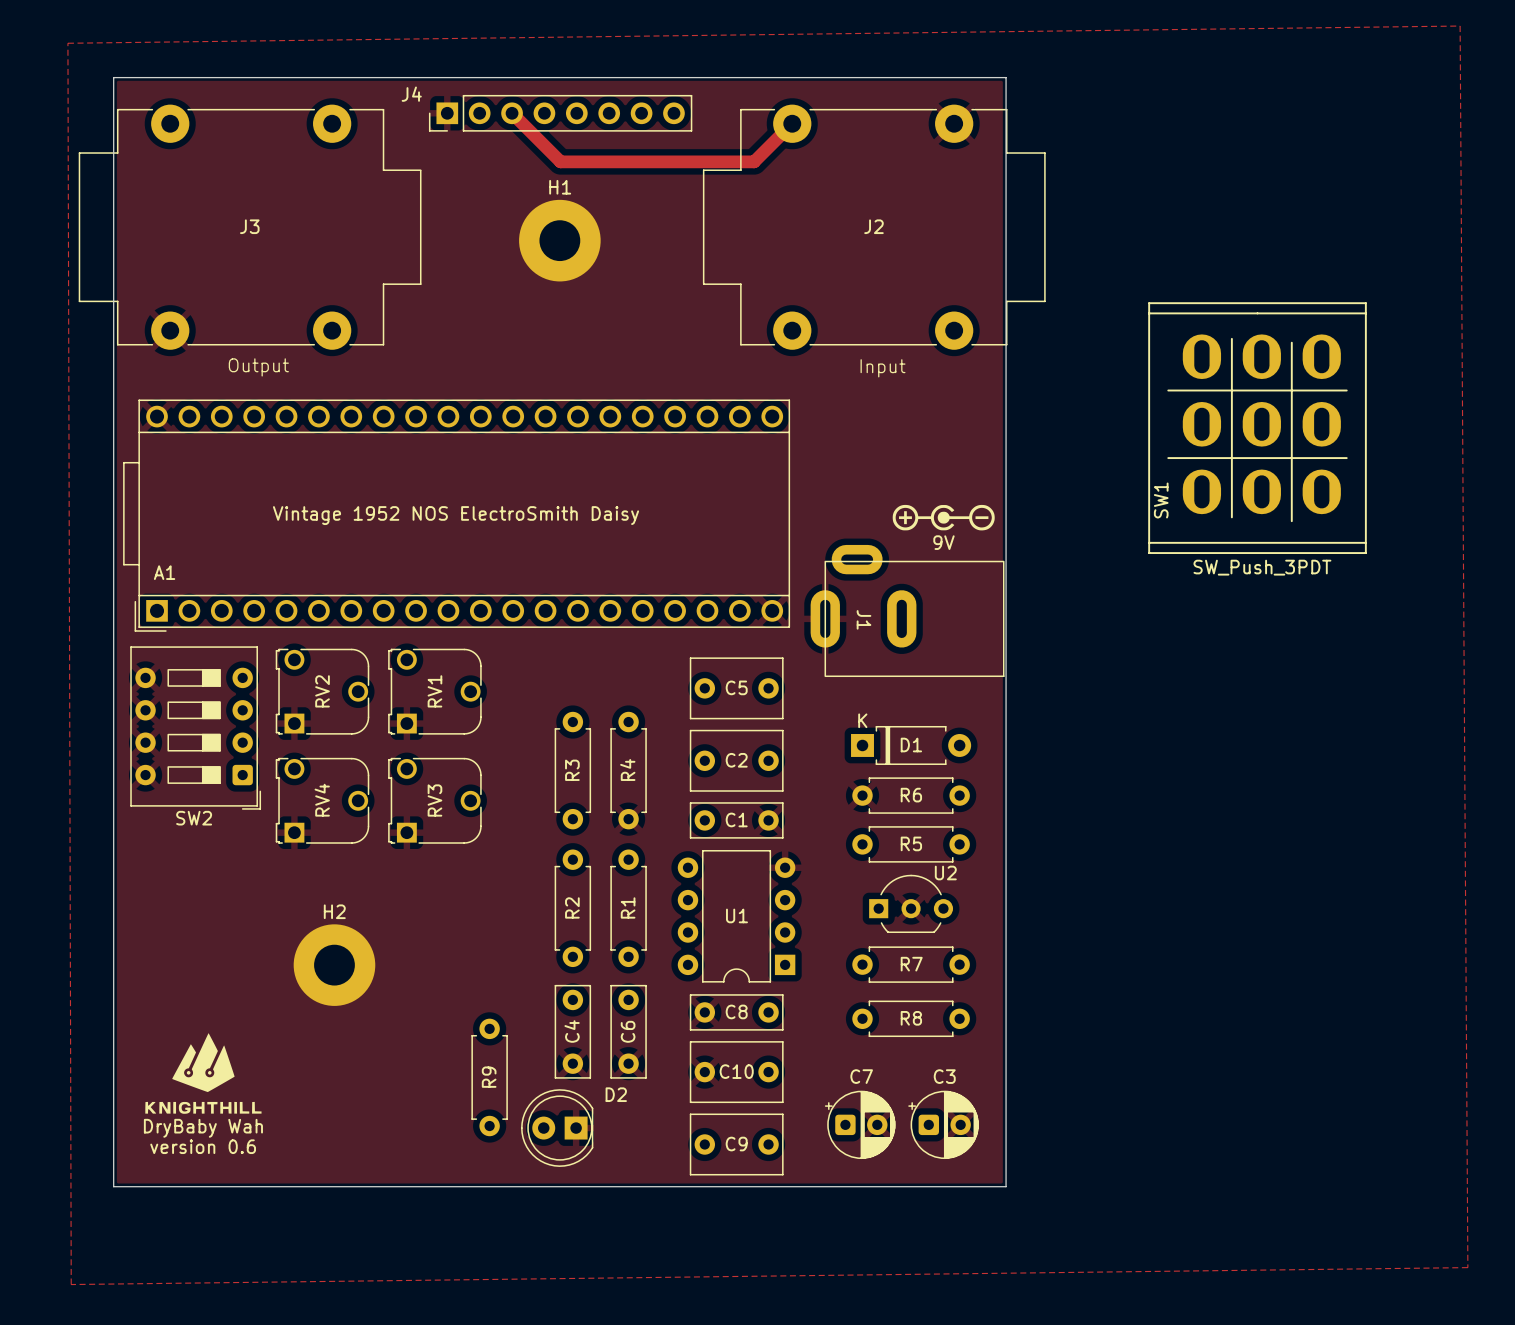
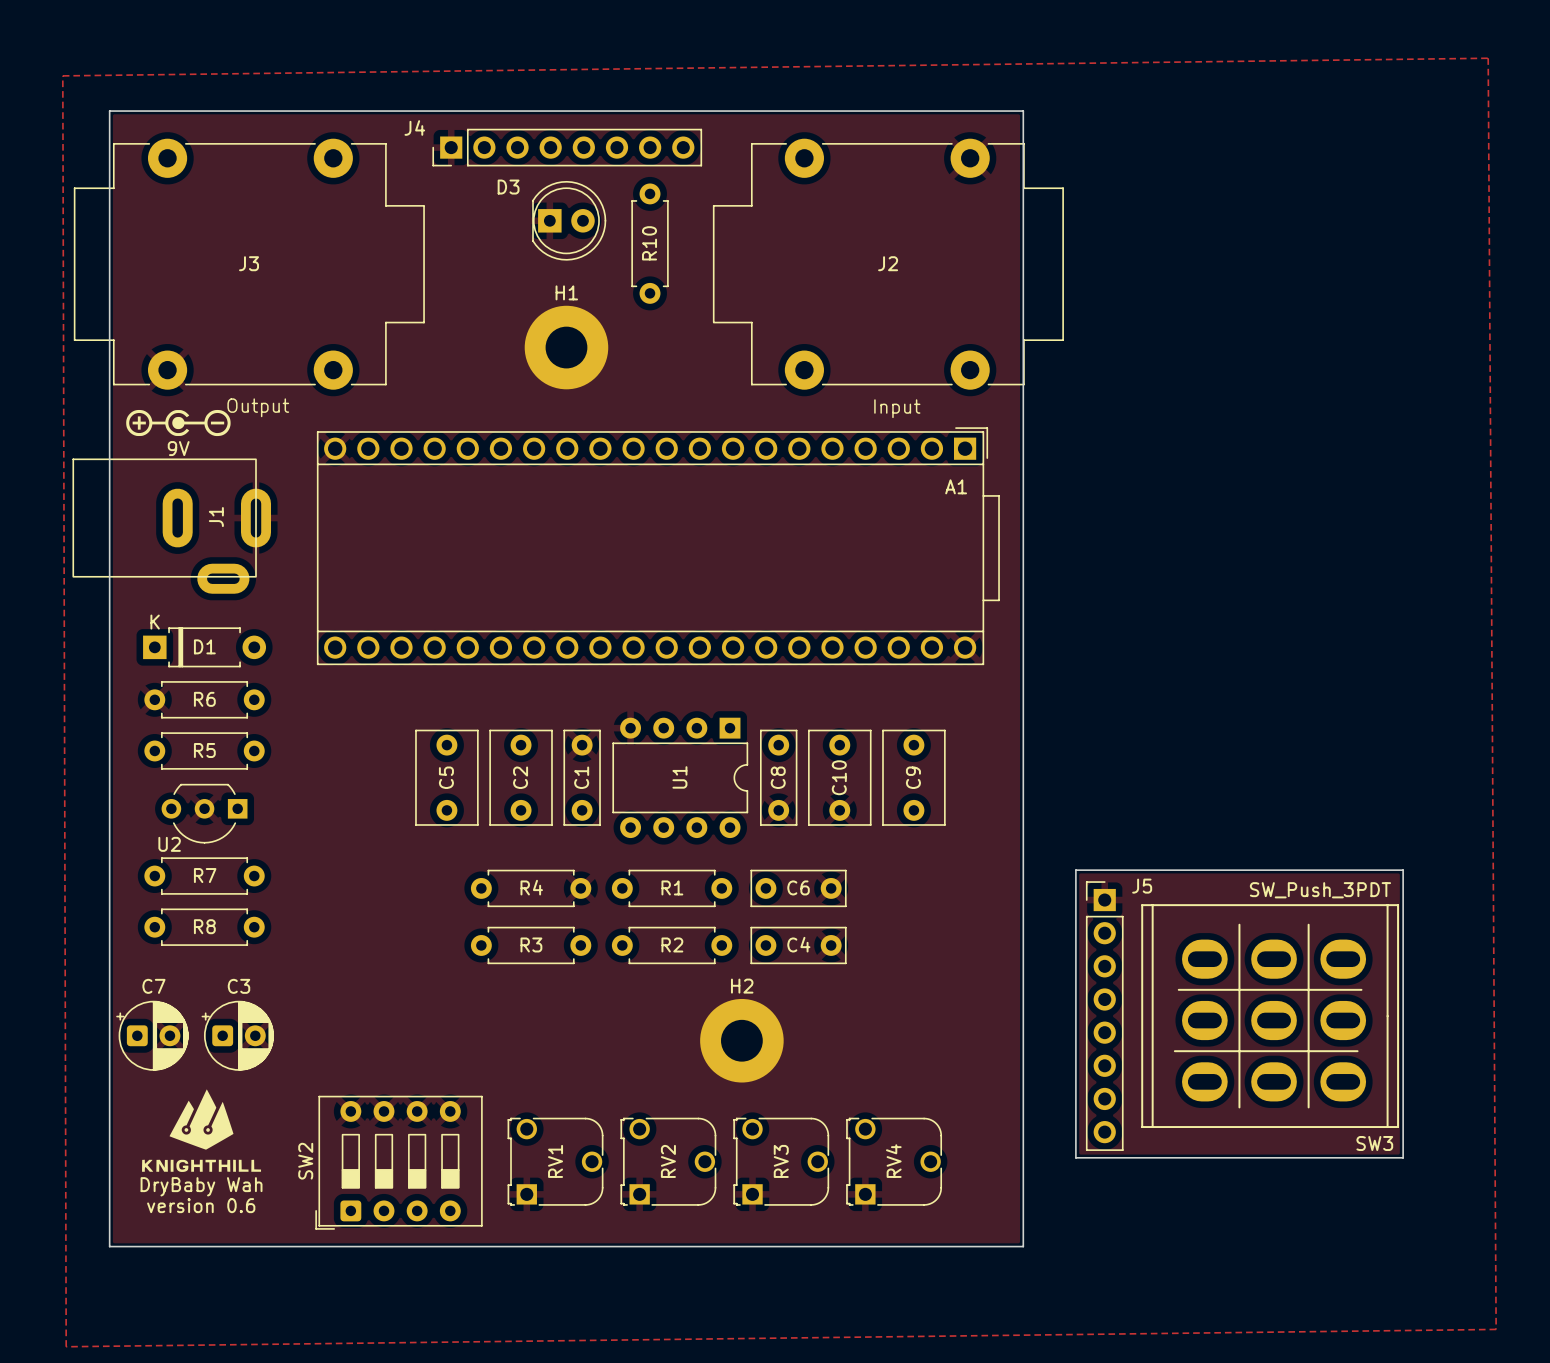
track: (512, 113) (560, 161) (754, 161) (792, 123) -> none
D3: none -> (569, 220)
R10: none -> (650, 243)
H1 position: (559, 240) -> (566, 347)
drawing: none -> [126, 409, 231, 437]
text: none -> 9V (178, 448)
SW1: SW_Push_3PDT (1257, 428) -> none
drawing: [892, 504, 995, 531] -> none
A1 rotation: 0° (456, 515) -> 180° (658, 546)
text: Vintage 1952 NOS ElectroSmith Daisy (456, 515) -> none
text: 9V (943, 542) -> none
J1 rotation: 0° (907, 610) -> 180° (171, 526)
J1 position: (907, 610) -> (171, 526)
C5 rotation: 0° (736, 688) -> 90° clockwise (446, 777)
C5 position: (736, 688) -> (446, 777)
RV2 position: (322, 691) -> (668, 1161)
RV1 position: (434, 691) -> (555, 1161)
SW2 rotation: 0° (195, 728) -> 90° clockwise (399, 1162)
SW2 position: (195, 728) -> (399, 1162)
D1 position: (911, 745) -> (204, 647)
C2 rotation: 0° (736, 760) -> 90° clockwise (521, 777)
C2 position: (736, 760) -> (521, 777)
R3 rotation: 0° (572, 770) -> 90° clockwise (531, 945)
R3 position: (572, 770) -> (531, 945)
R4 rotation: 0° (628, 770) -> 90° clockwise (531, 888)
R4 position: (628, 770) -> (531, 888)
R6 position: (911, 795) -> (204, 699)
RV4 position: (322, 800) -> (894, 1161)
RV3 position: (434, 800) -> (781, 1161)
board edge: none -> (1075, 870) (1403, 870) (1403, 1157) (1075, 1157) (1075, 870)
C1 rotation: 0° (736, 820) -> 90° clockwise (582, 777)
C1 position: (736, 820) -> (582, 777)
R5 position: (911, 844) -> (204, 750)
U2 rotation: 0° (911, 903) -> 180° (204, 813)
U2 position: (911, 903) -> (204, 813)
R2 rotation: 0° (572, 908) -> 90° clockwise (672, 945)
R2 position: (572, 908) -> (672, 945)
R1 rotation: 0° (628, 908) -> 90° clockwise (672, 888)
R1 position: (628, 908) -> (672, 888)
U1 rotation: 0° (736, 916) -> 90° counterclockwise (680, 777)
U1 position: (736, 916) -> (680, 777)
J5: none -> (1104, 1016)
SW3: none -> SW_Push_3PDT (1270, 1016)
R7 position: (911, 964) -> (204, 876)
H2 position: (334, 965) -> (741, 1040)
C8 rotation: 0° (736, 1012) -> 90° clockwise (778, 777)
C8 position: (736, 1012) -> (778, 777)
R8 position: (911, 1018) -> (204, 927)
C4 rotation: 0° (572, 1031) -> 90° clockwise (798, 945)
C4 position: (572, 1031) -> (798, 945)
C6 rotation: 0° (628, 1031) -> 90° clockwise (798, 888)
C6 position: (628, 1031) -> (798, 888)
C10 rotation: 0° (736, 1072) -> 90° clockwise (839, 777)
C10 position: (736, 1072) -> (839, 777)
R9: (489, 1077) -> none
C7 position: (860, 1124) -> (152, 1035)
C3 position: (943, 1124) -> (237, 1035)
D2: (557, 1128) -> none
C9 rotation: 0° (736, 1144) -> 90° clockwise (913, 777)
C9 position: (736, 1144) -> (913, 777)

